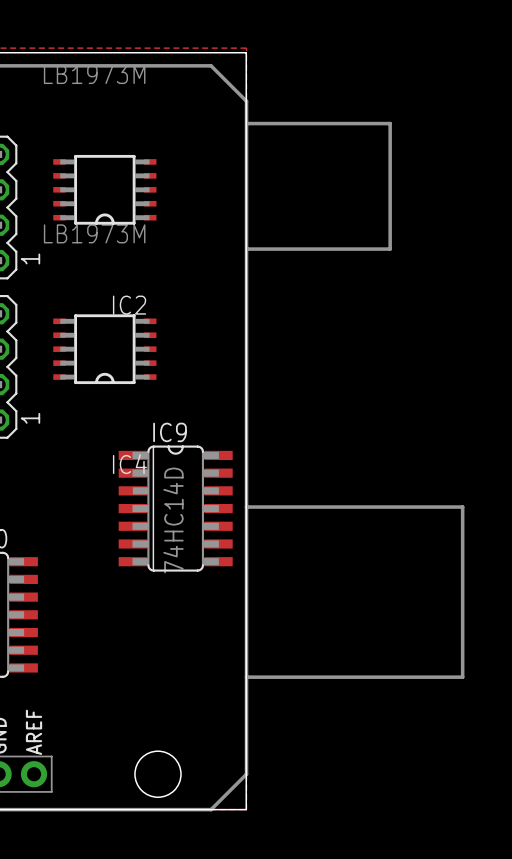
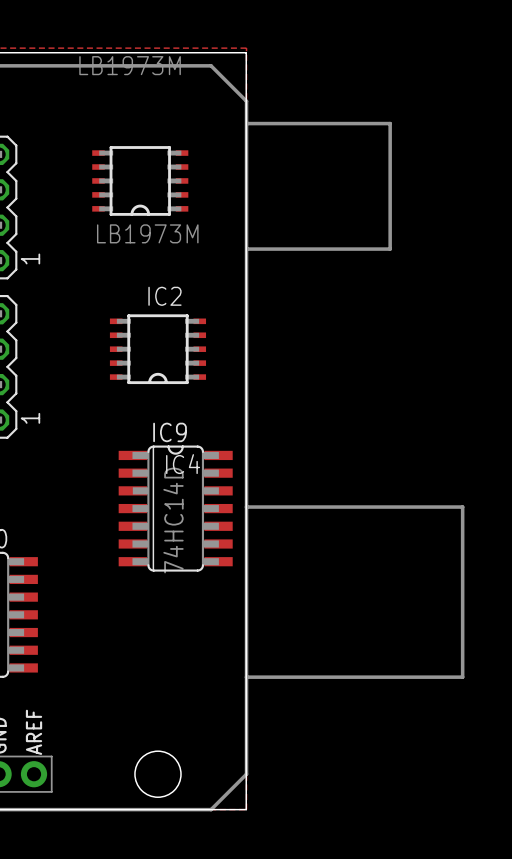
IC2 footprint: [53, 154, 157, 225] -> [92, 146, 189, 216]
IC4 footprint: [53, 314, 157, 385] -> [109, 314, 207, 385]

